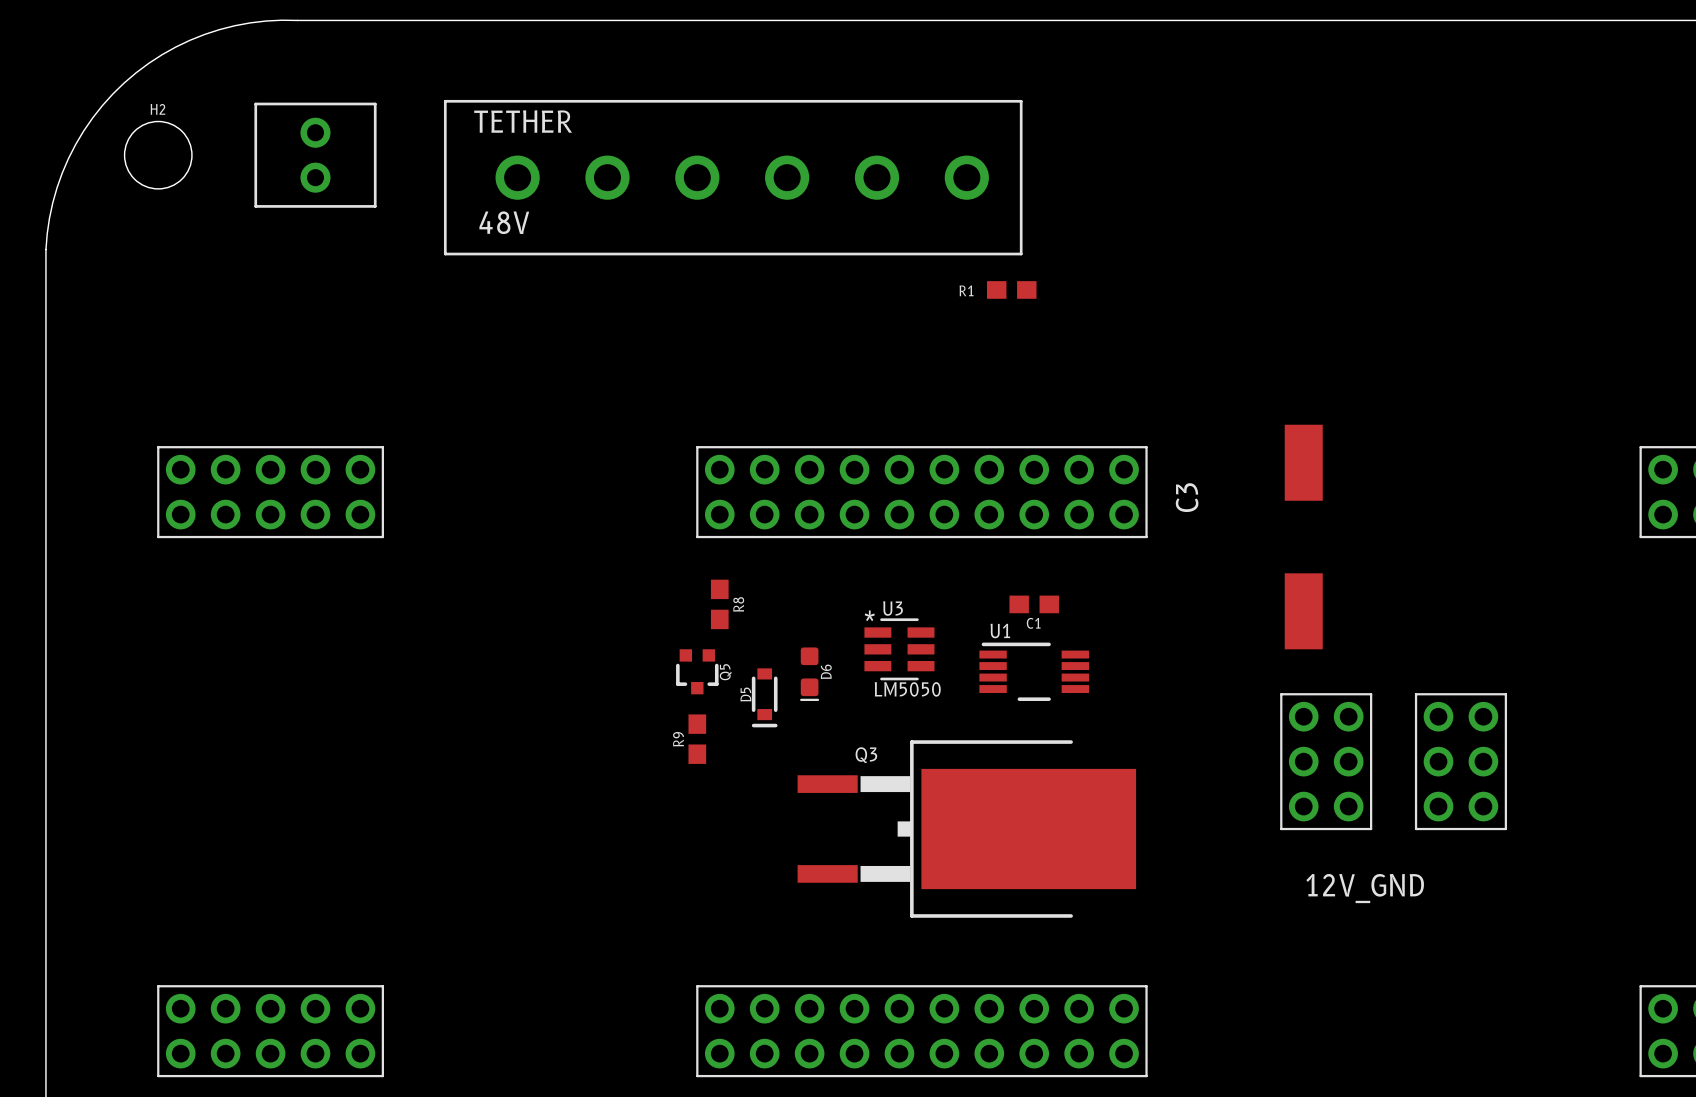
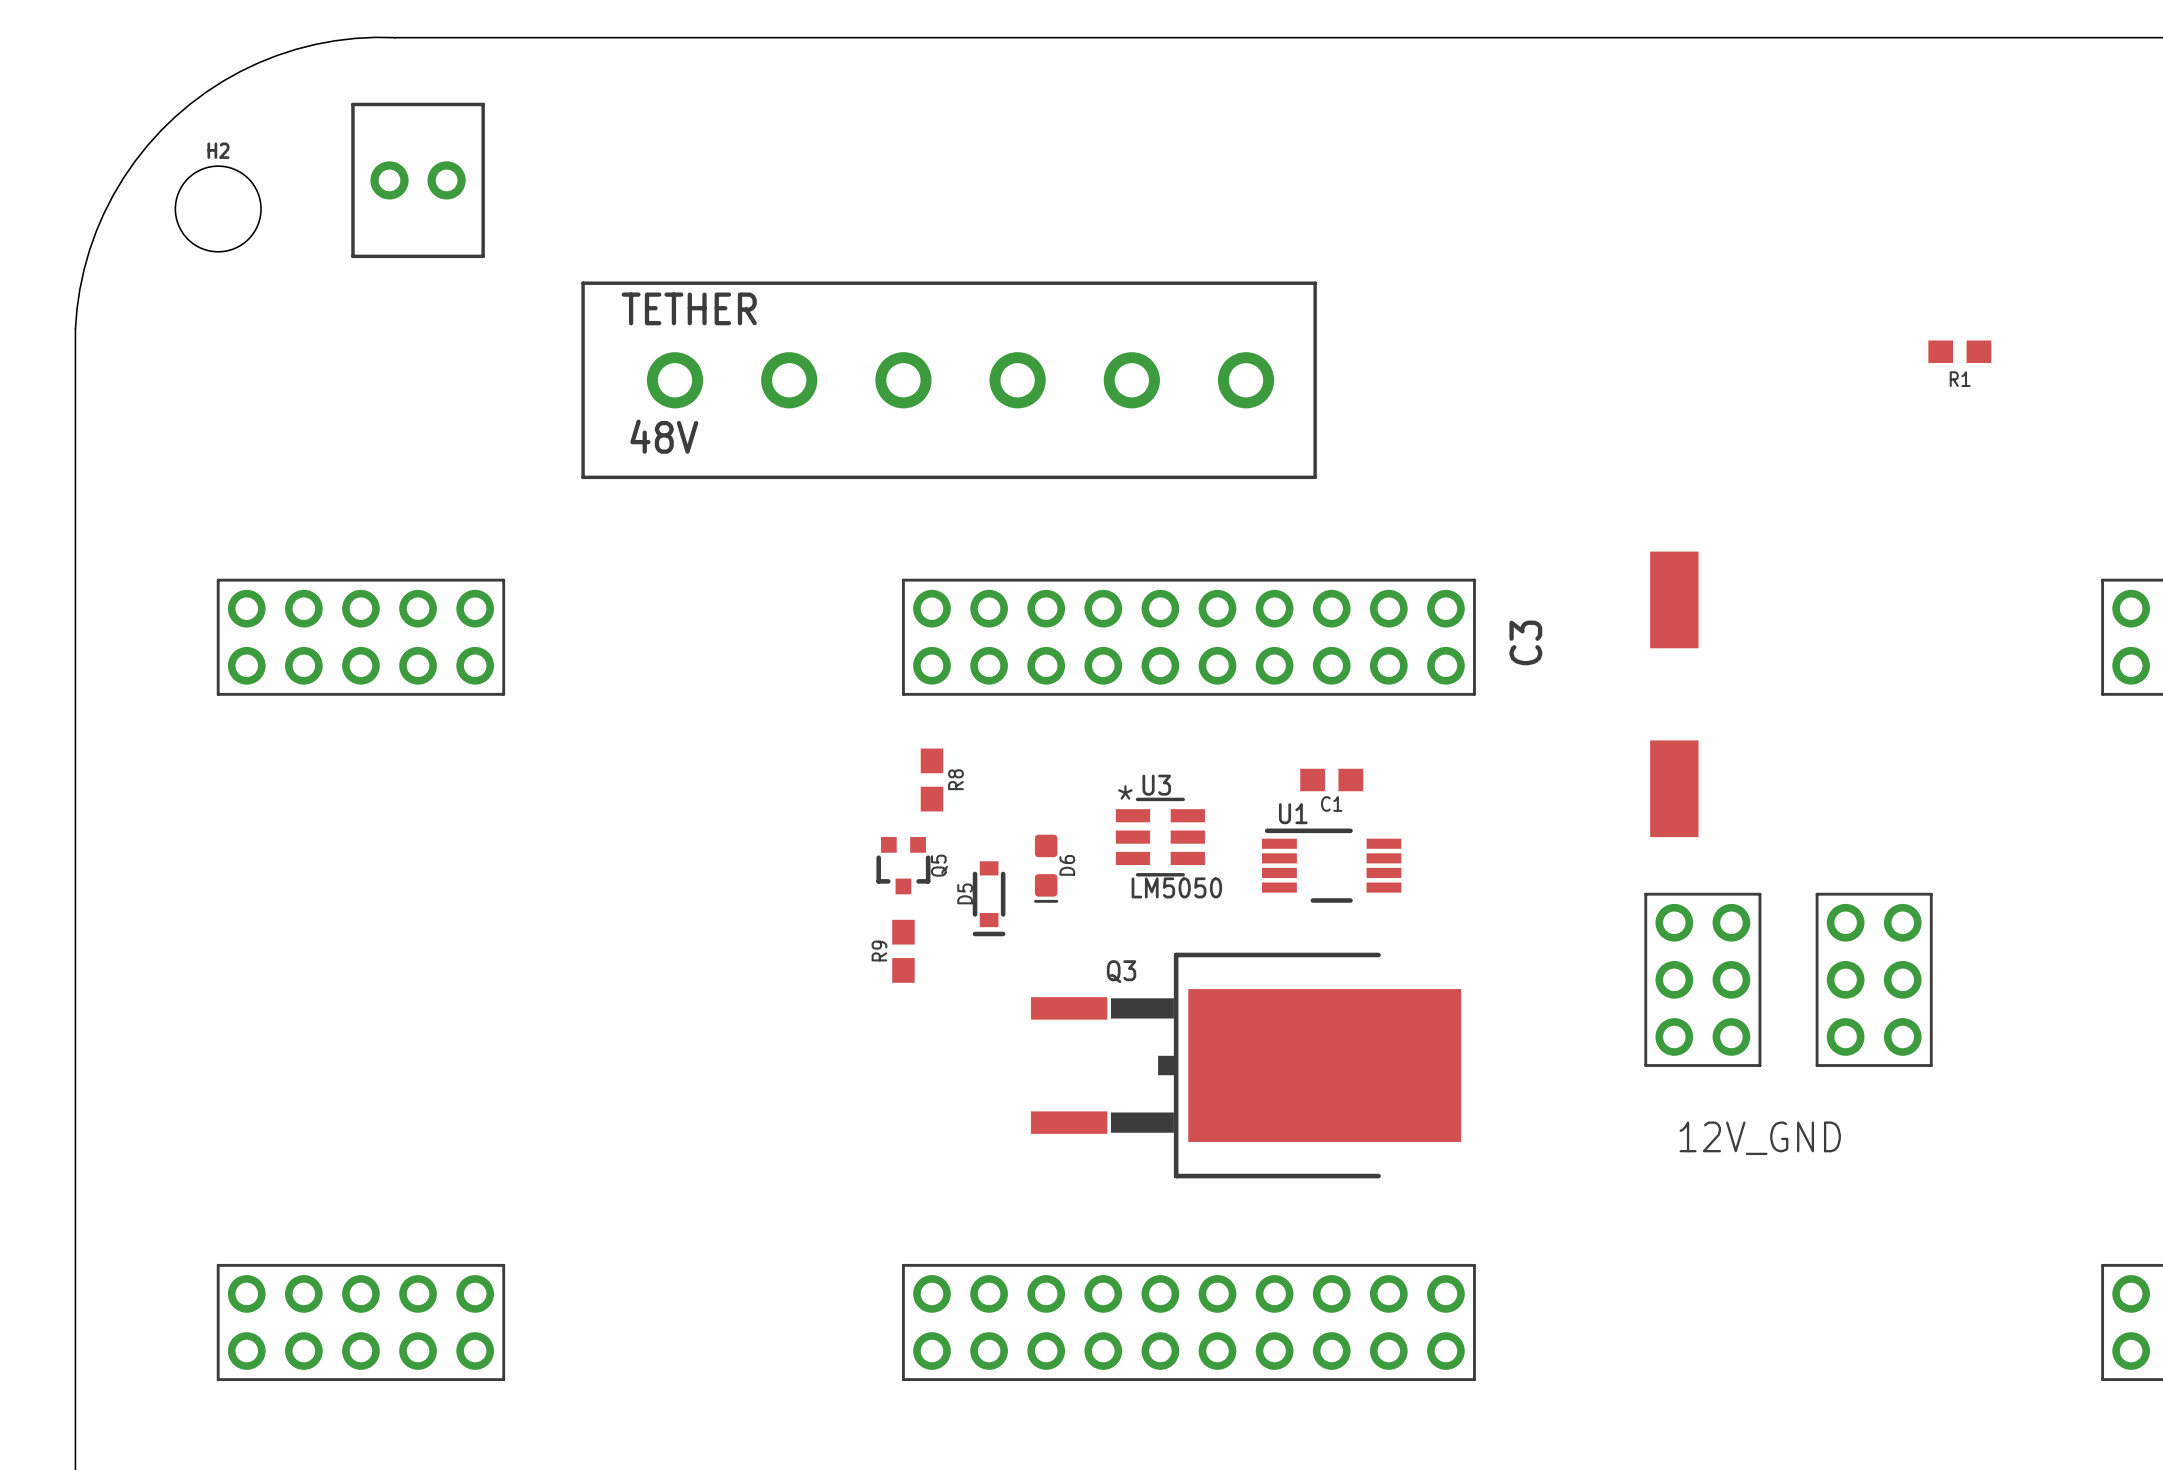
part rotation: 0° (315, 155) -> 90° clockwise (418, 180)
TETHER position: (733, 177) -> (949, 380)
R1 position: (1011, 289) -> (1959, 351)
R1 name position: R1 (966, 290) -> R1 (1960, 379)

